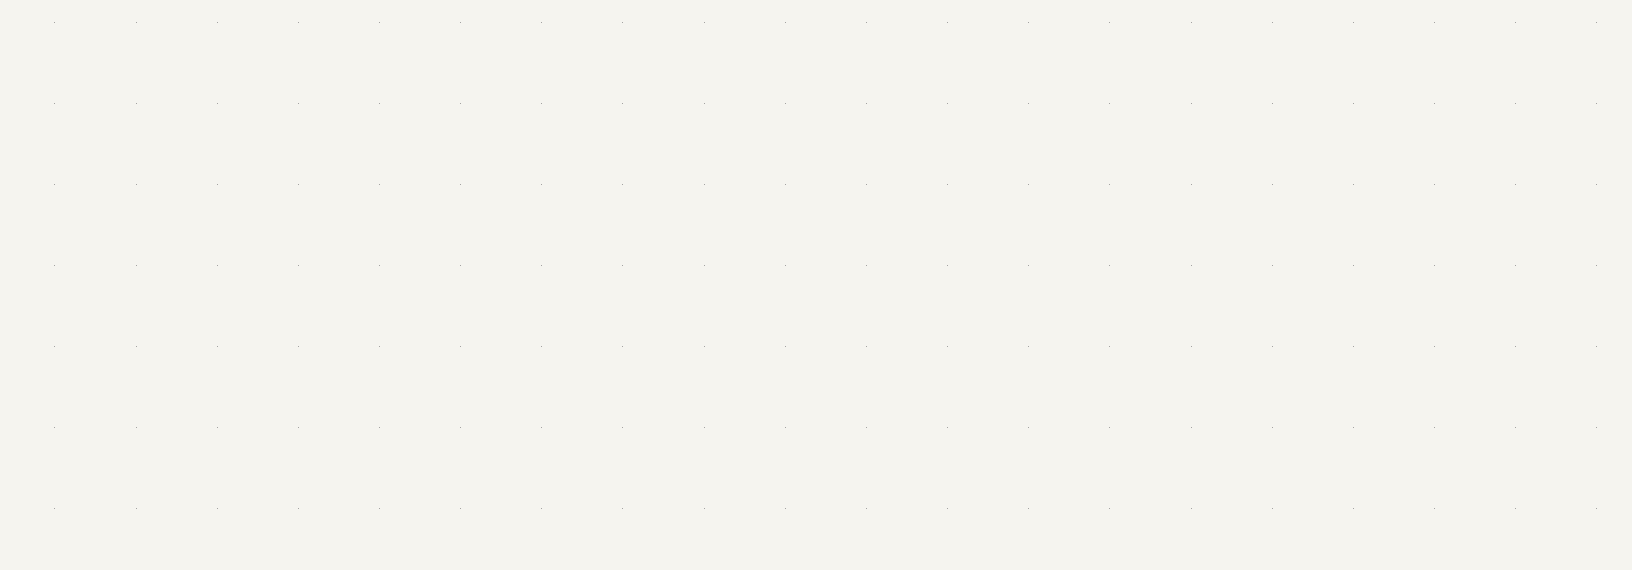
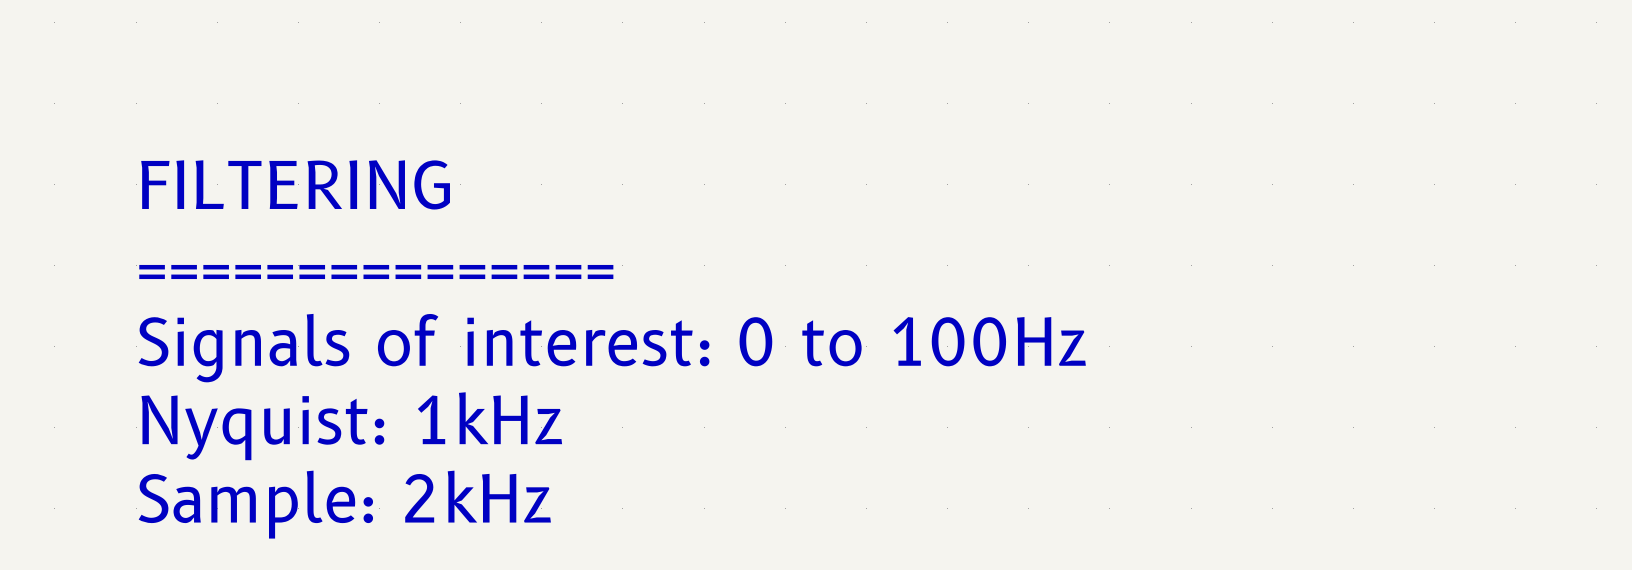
text: none -> FILTERING (295, 184)
text: none -> =============== (376, 272)
text: none -> Signals of interest: 0 to 100Hz (612, 348)
text: none -> Nyquist: 1kHz (351, 426)
text: none -> Sample: 2kHz (344, 504)

